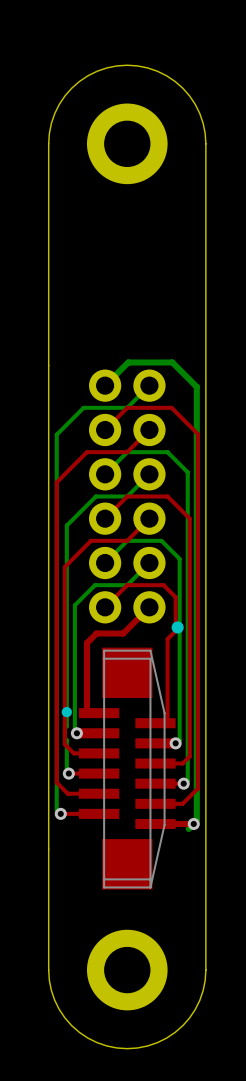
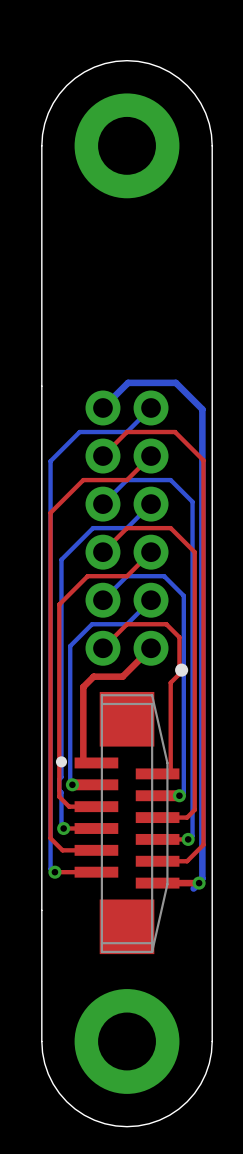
part footprint: [86, 103, 168, 185] -> [74, 93, 180, 199]
part footprint: [86, 929, 168, 1011] -> [74, 989, 180, 1094]

